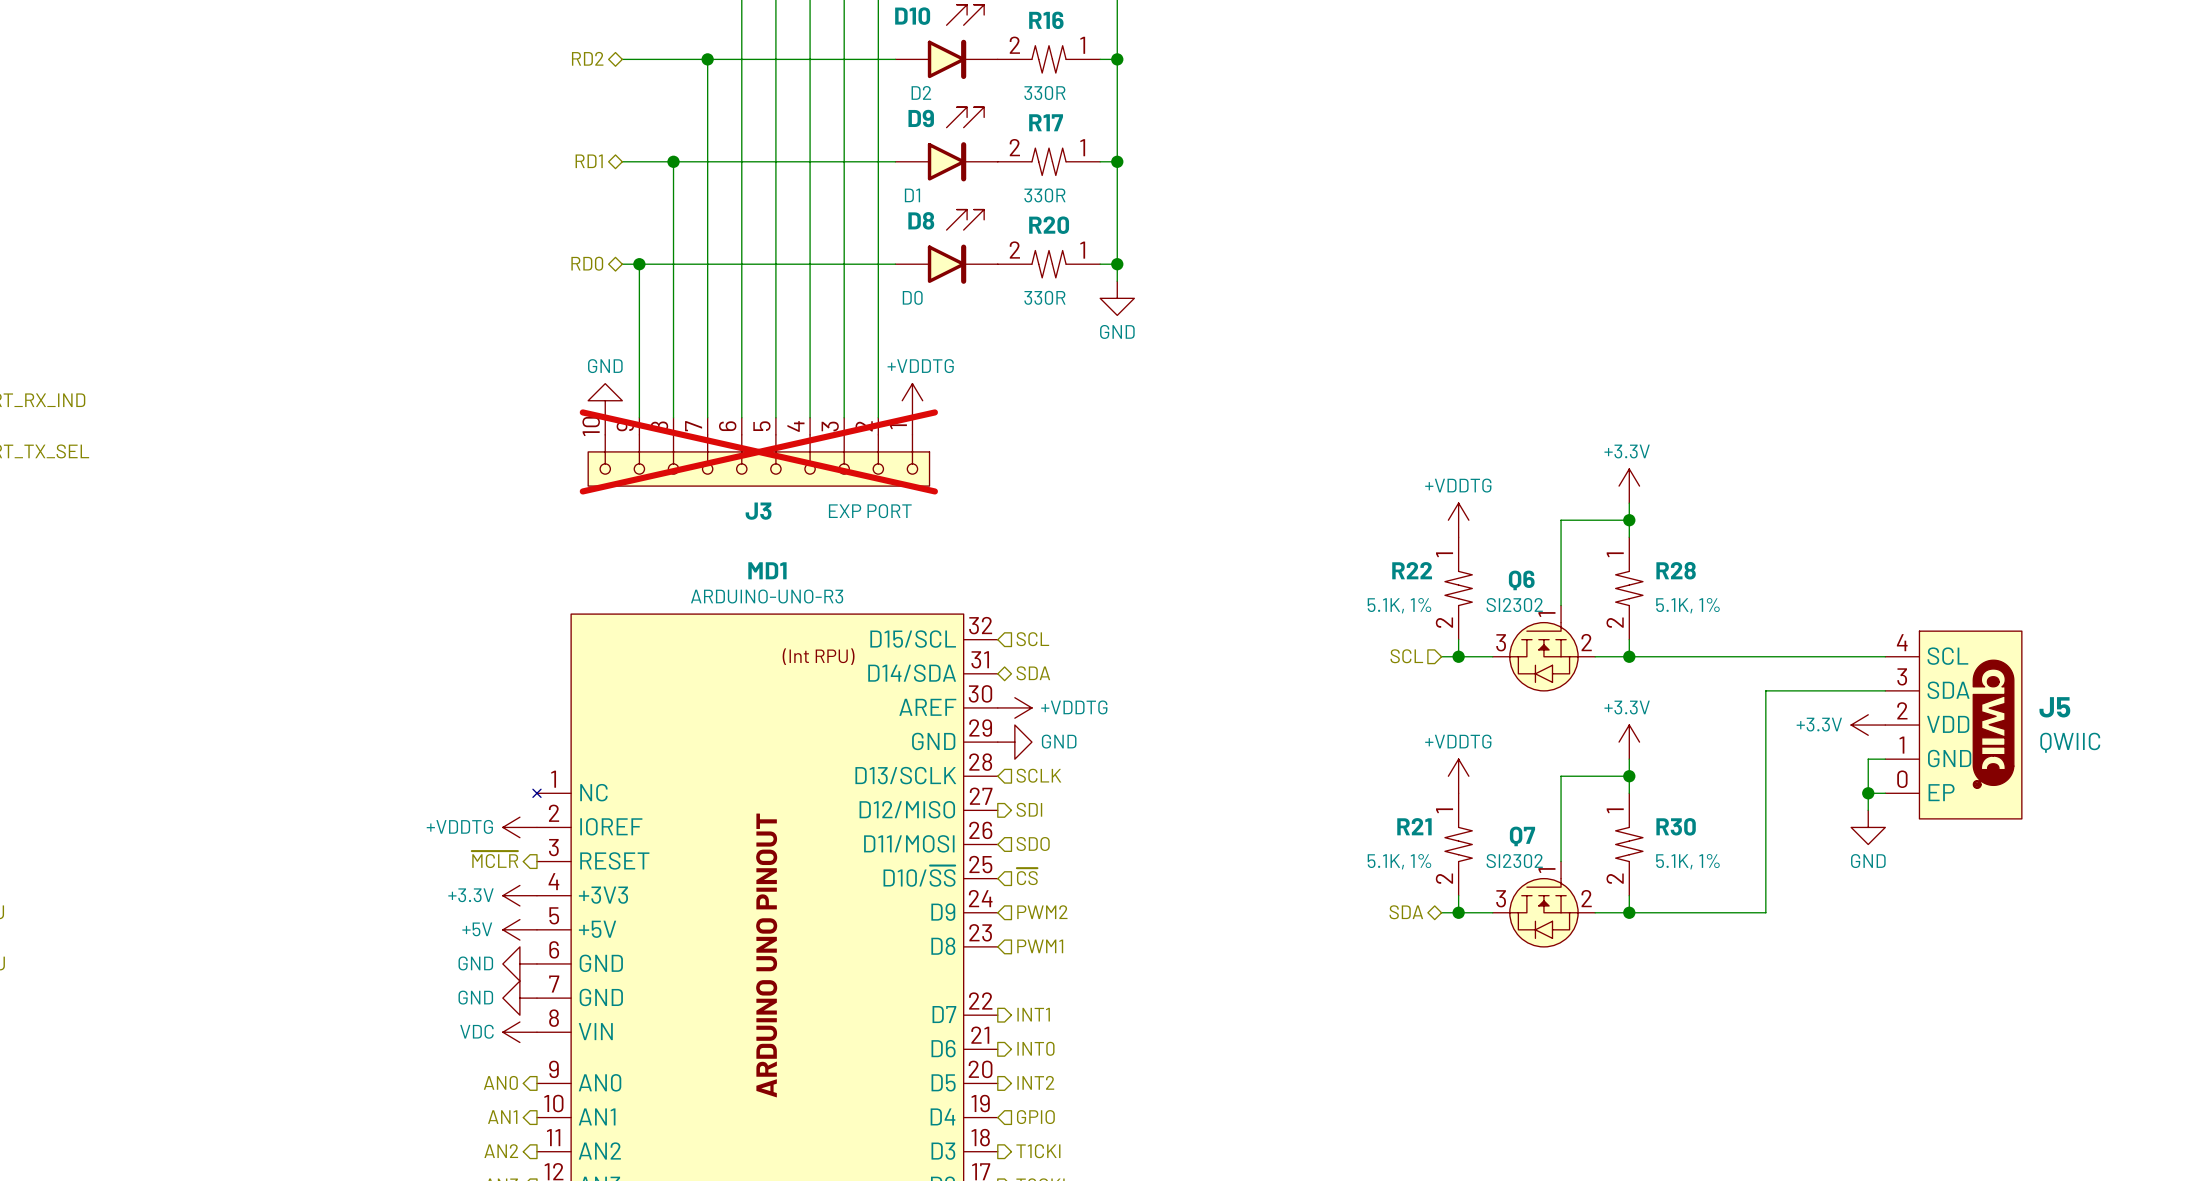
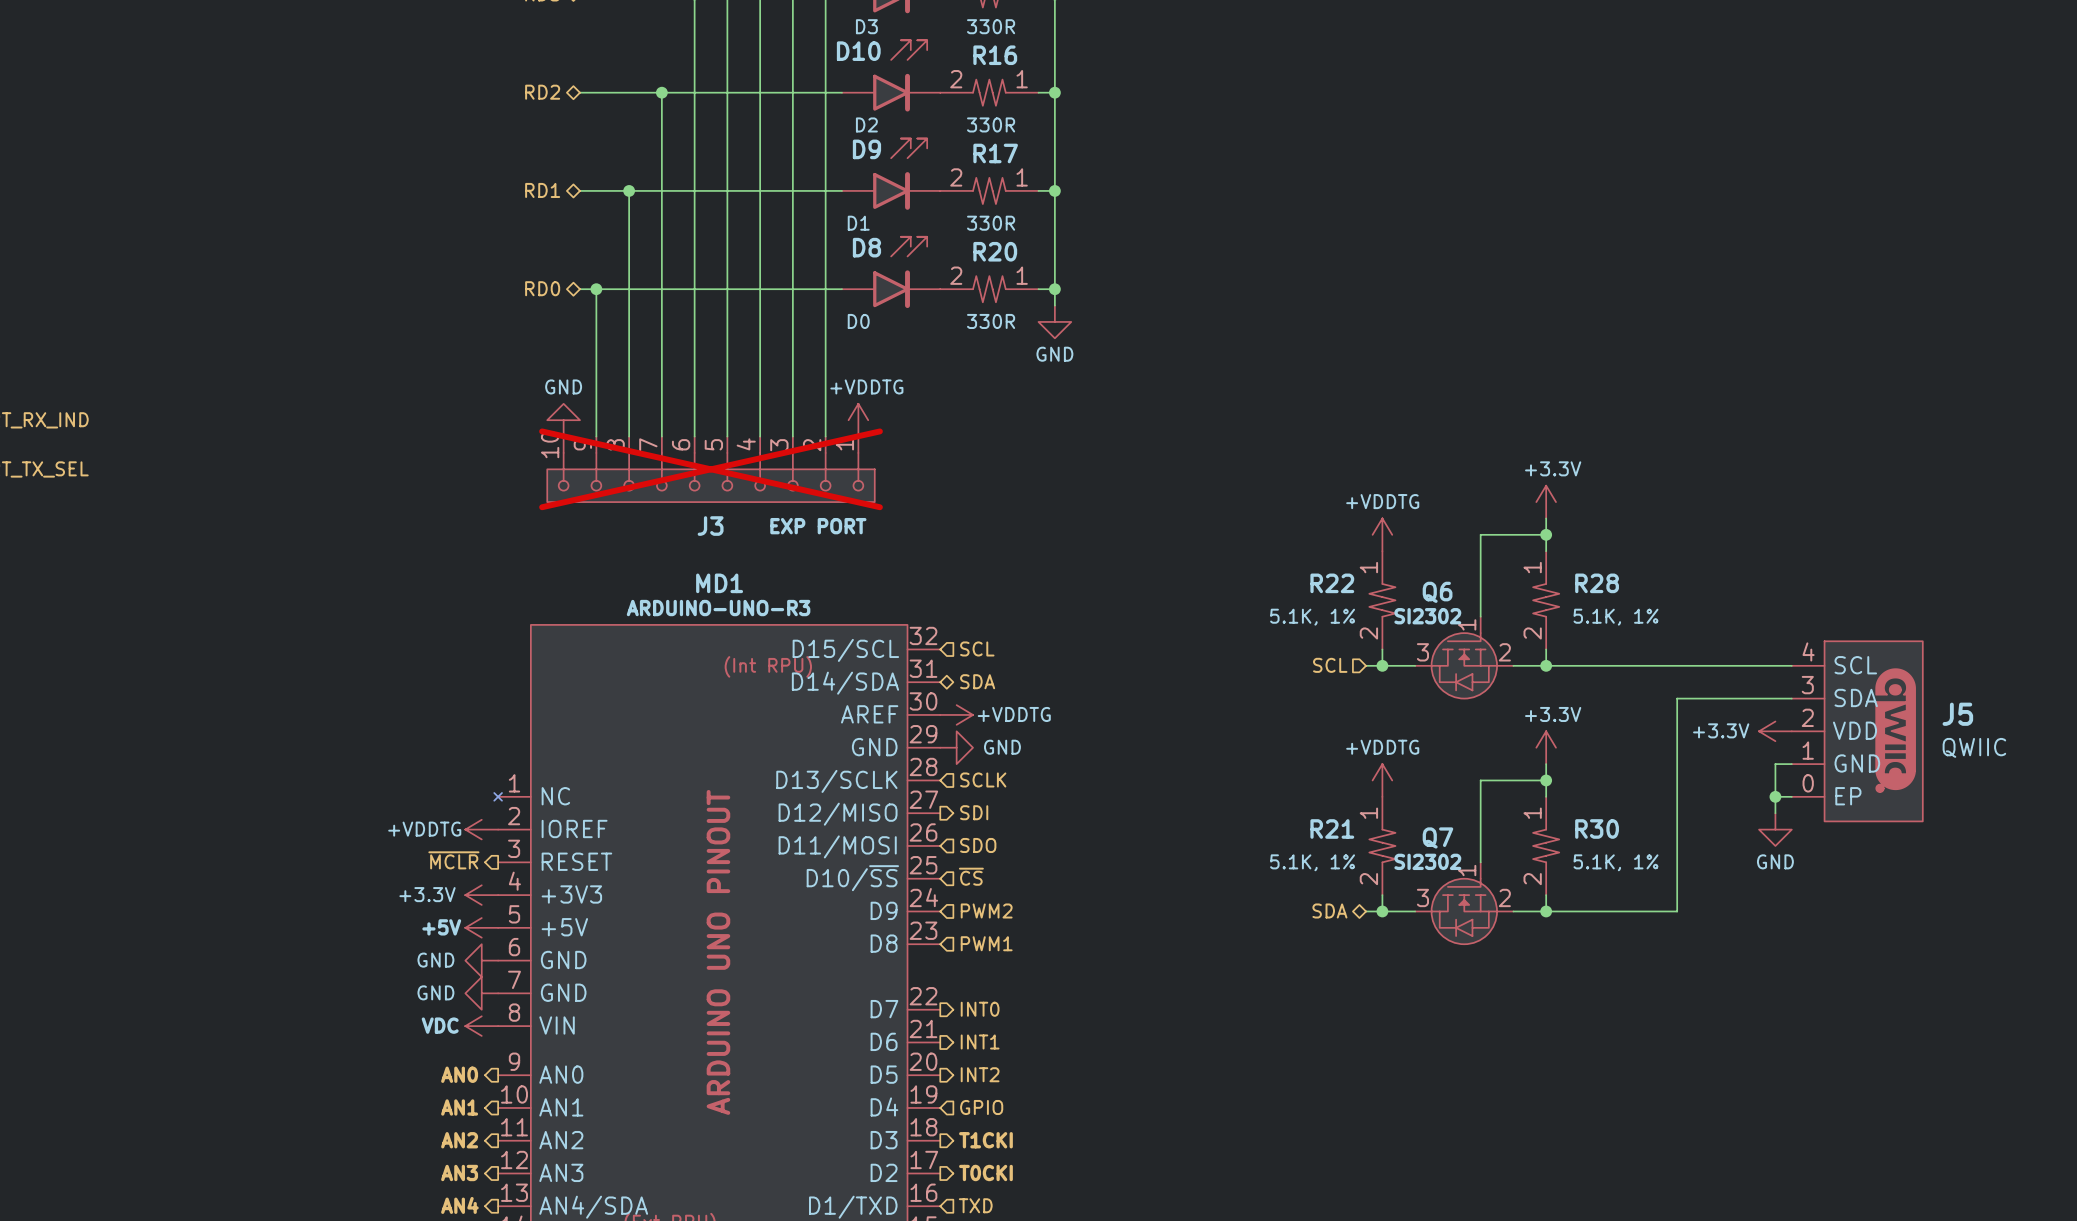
hierarchical label: INT1 (1033, 1014) -> INT0 (980, 1009)
hierarchical label: INT0 (1035, 1048) -> INT1 (980, 1041)

